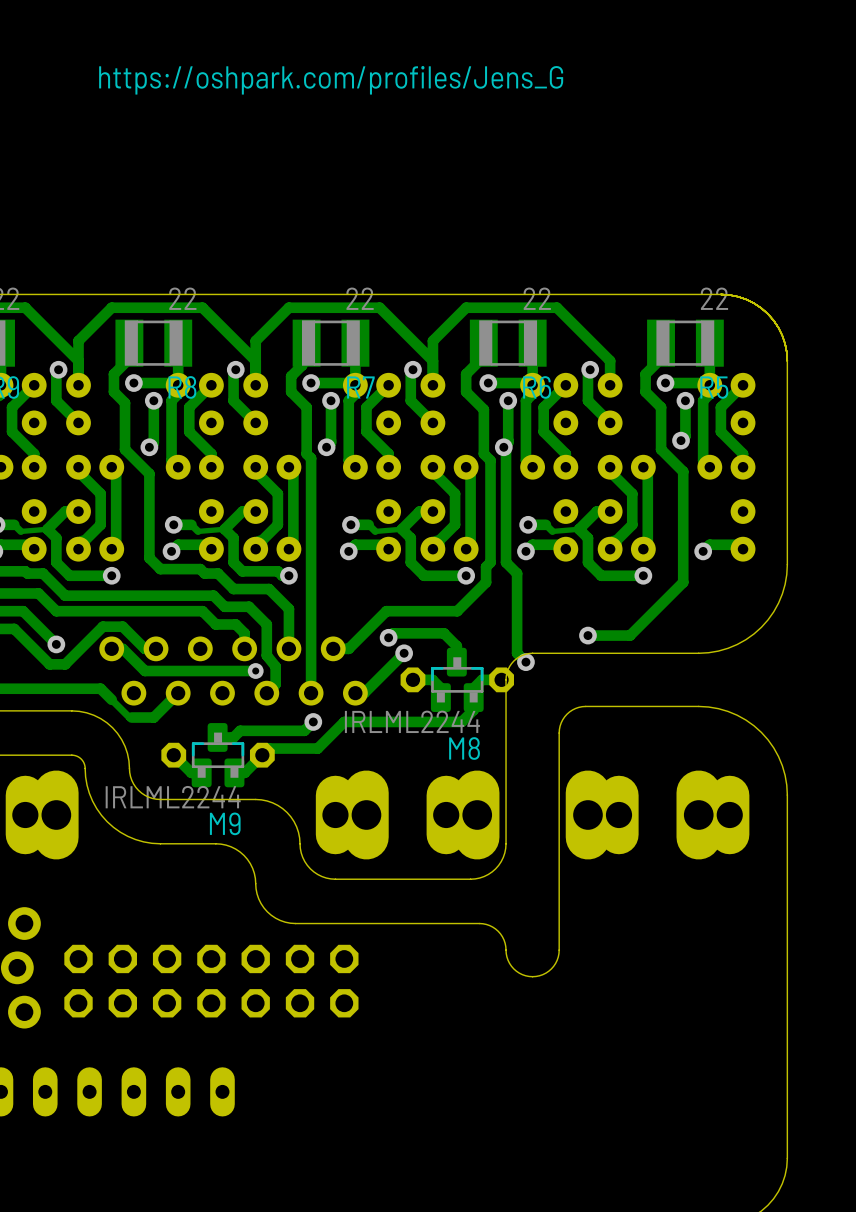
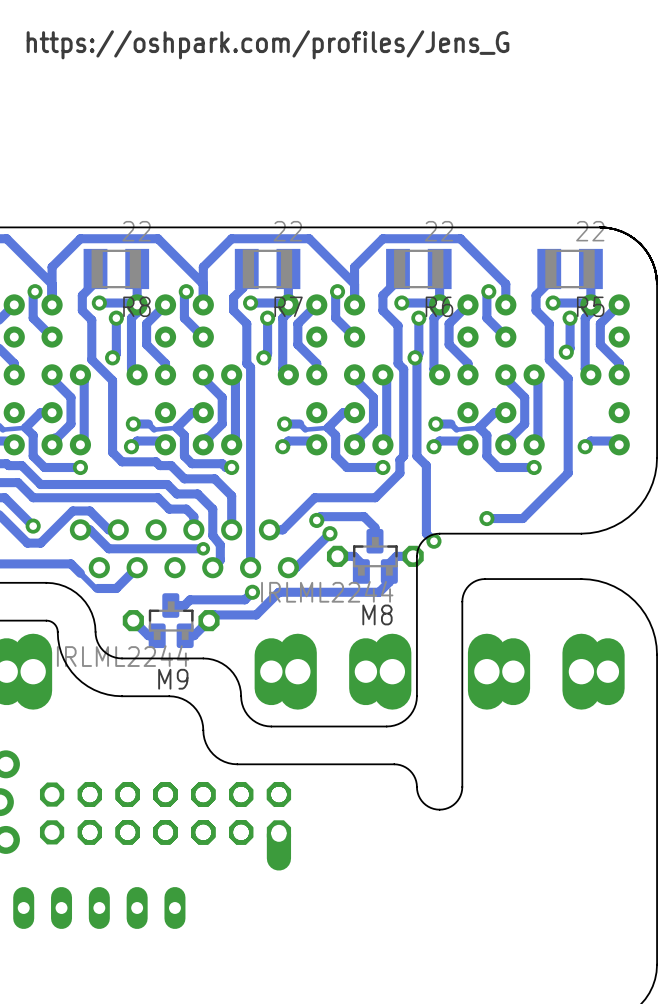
part: none -> (184, 826)

